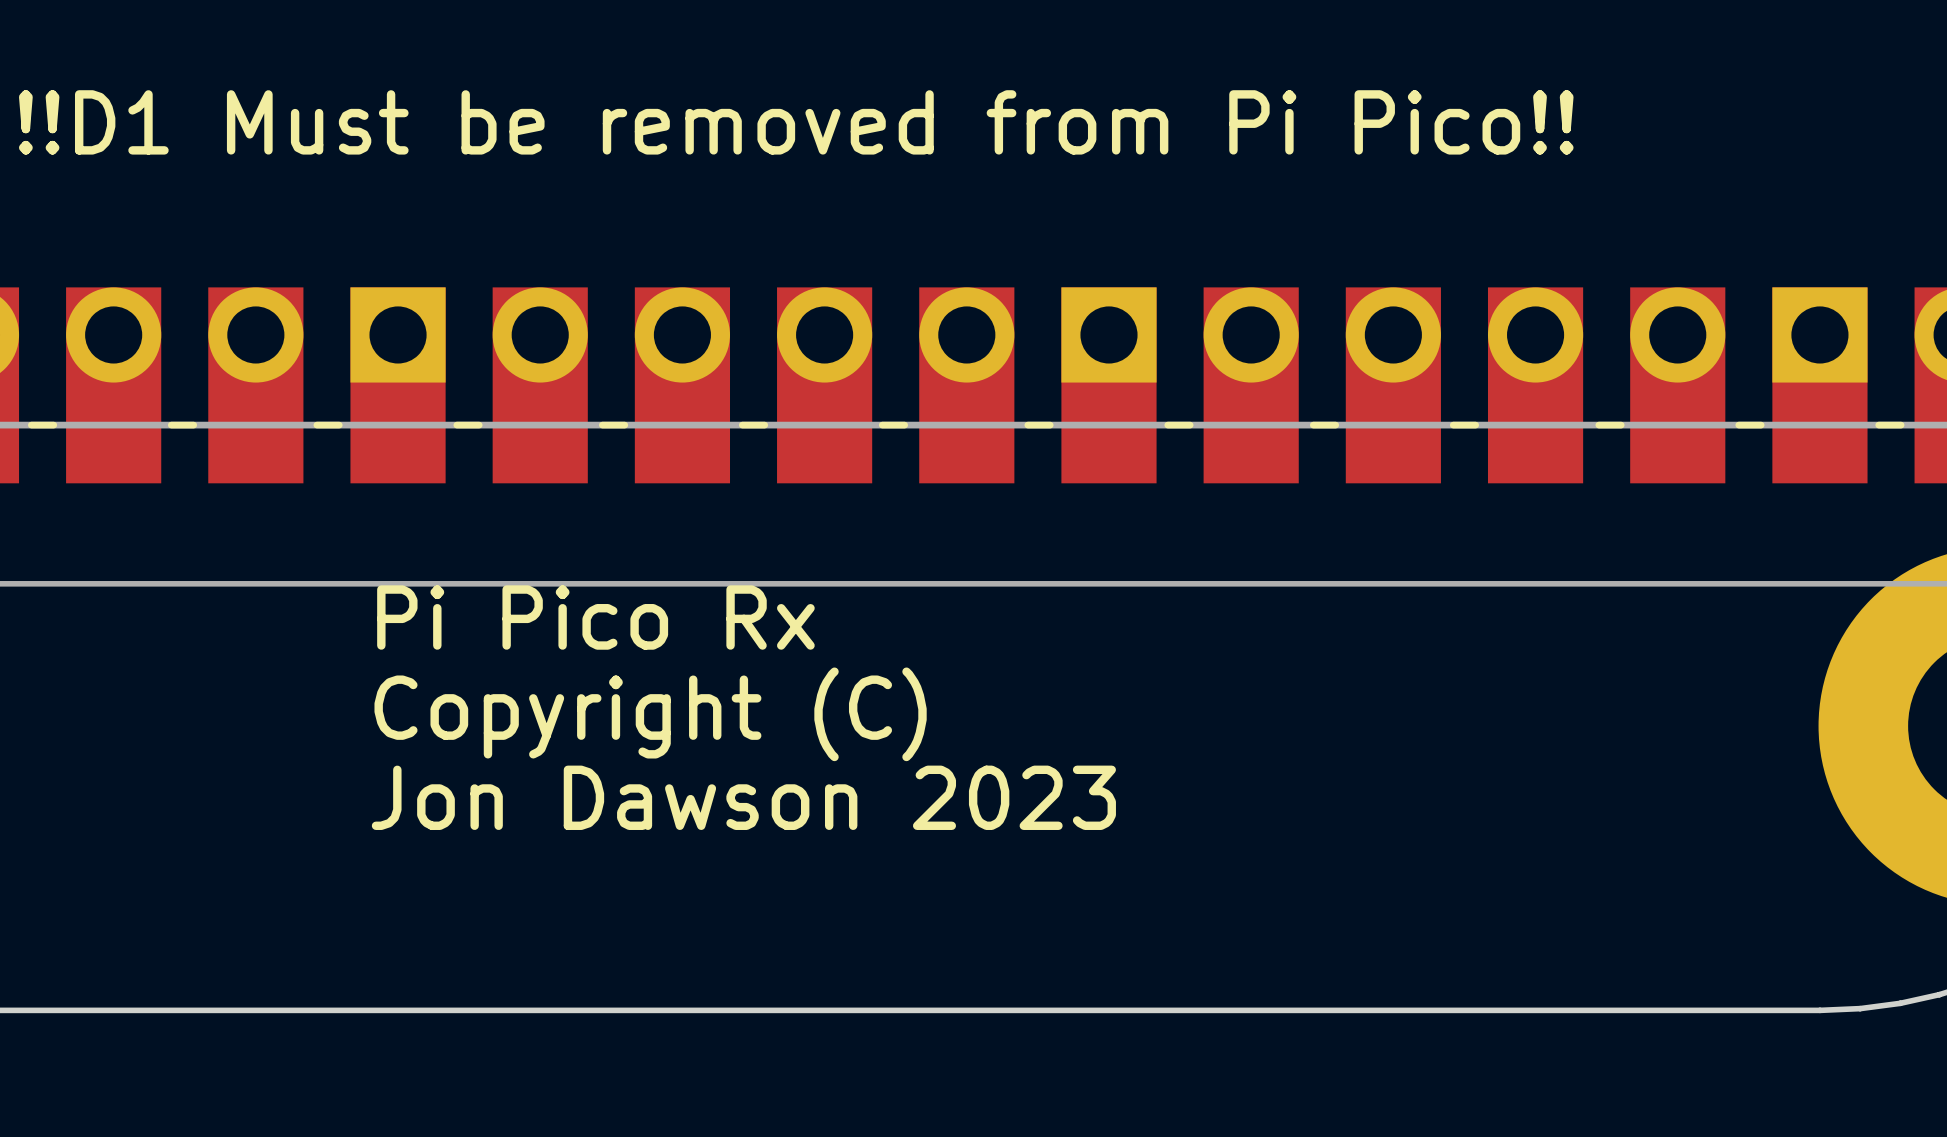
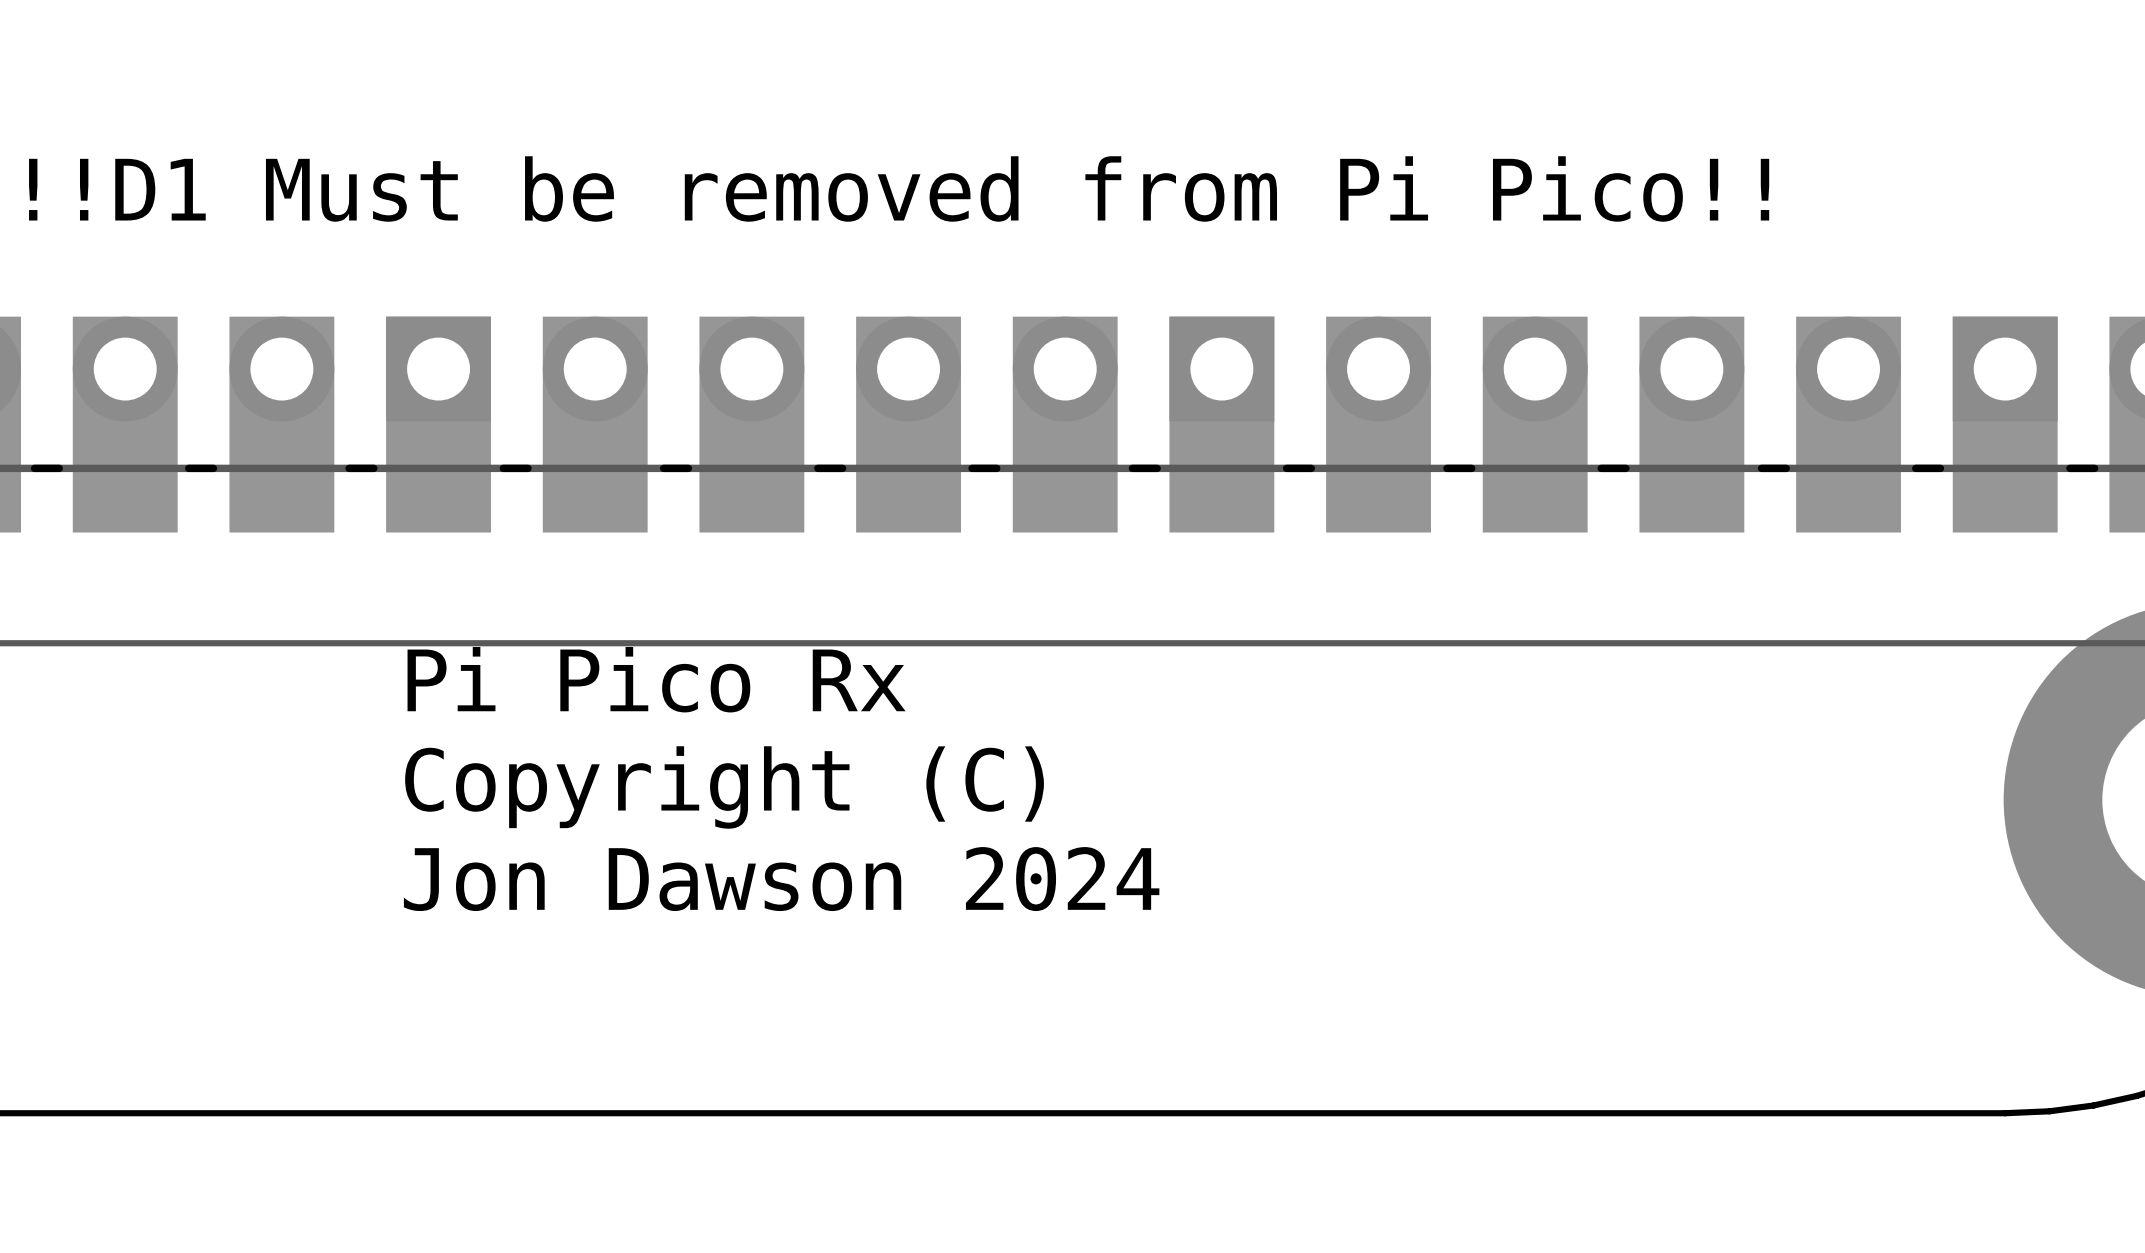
text position: !!D1 Must be removed from Pi Pico!! (796, 122) -> !!D1 Must be removed from Pi Pico!! (899, 188)
text: Jon Dawson 2023 (743, 797) -> Jon Dawson 2024 (781, 879)

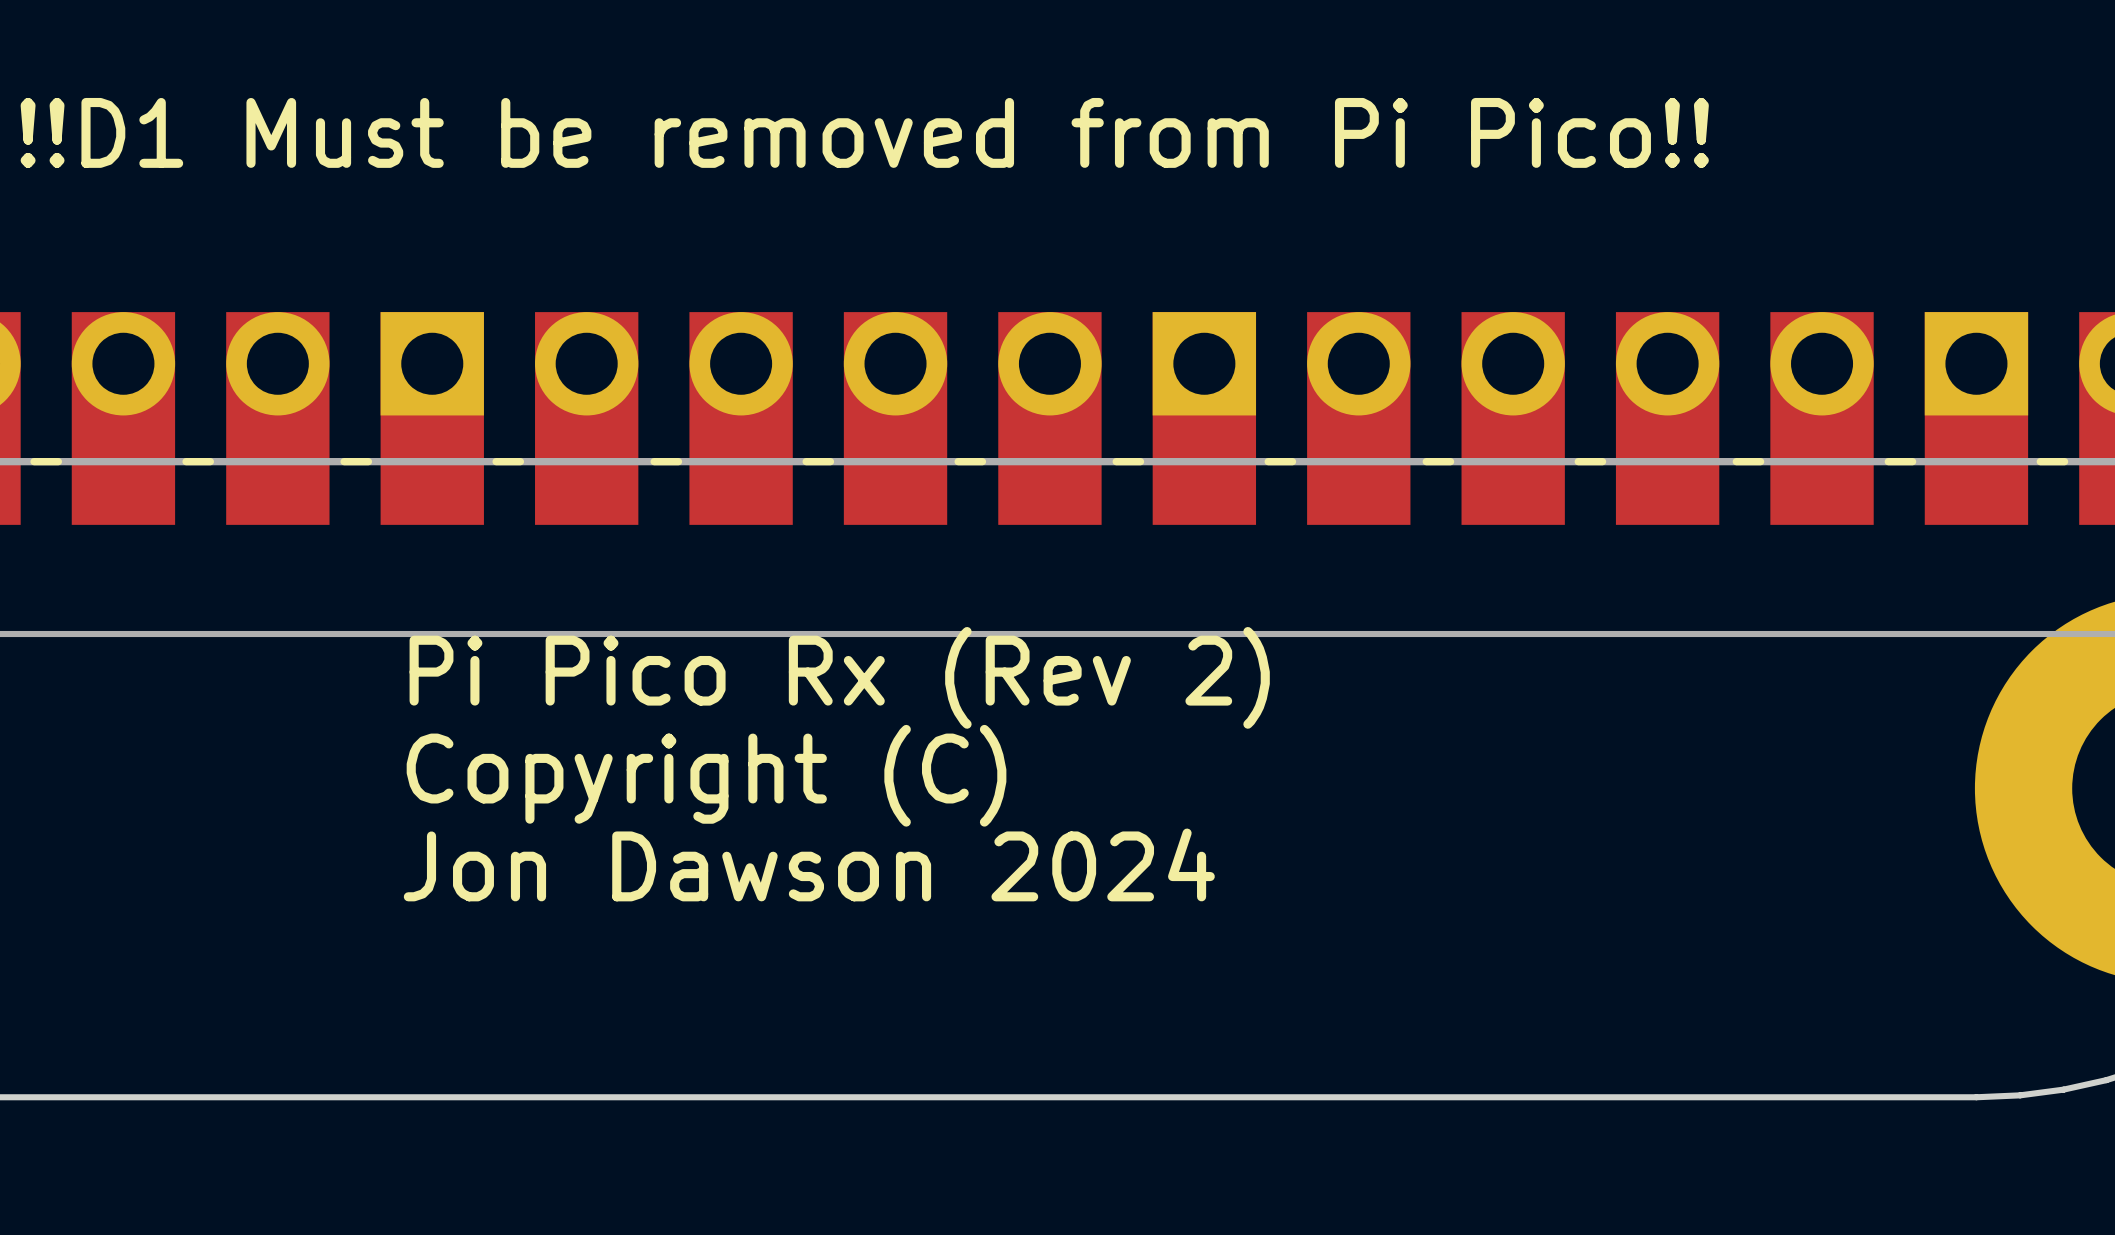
text position: !!D1 Must be removed from Pi Pico!! (899, 188) -> !!D1 Must be removed from Pi Pico!! (864, 132)
text: Pi Pico Rx (656, 679) -> Pi Pico Rx (Rev 2) (839, 677)

